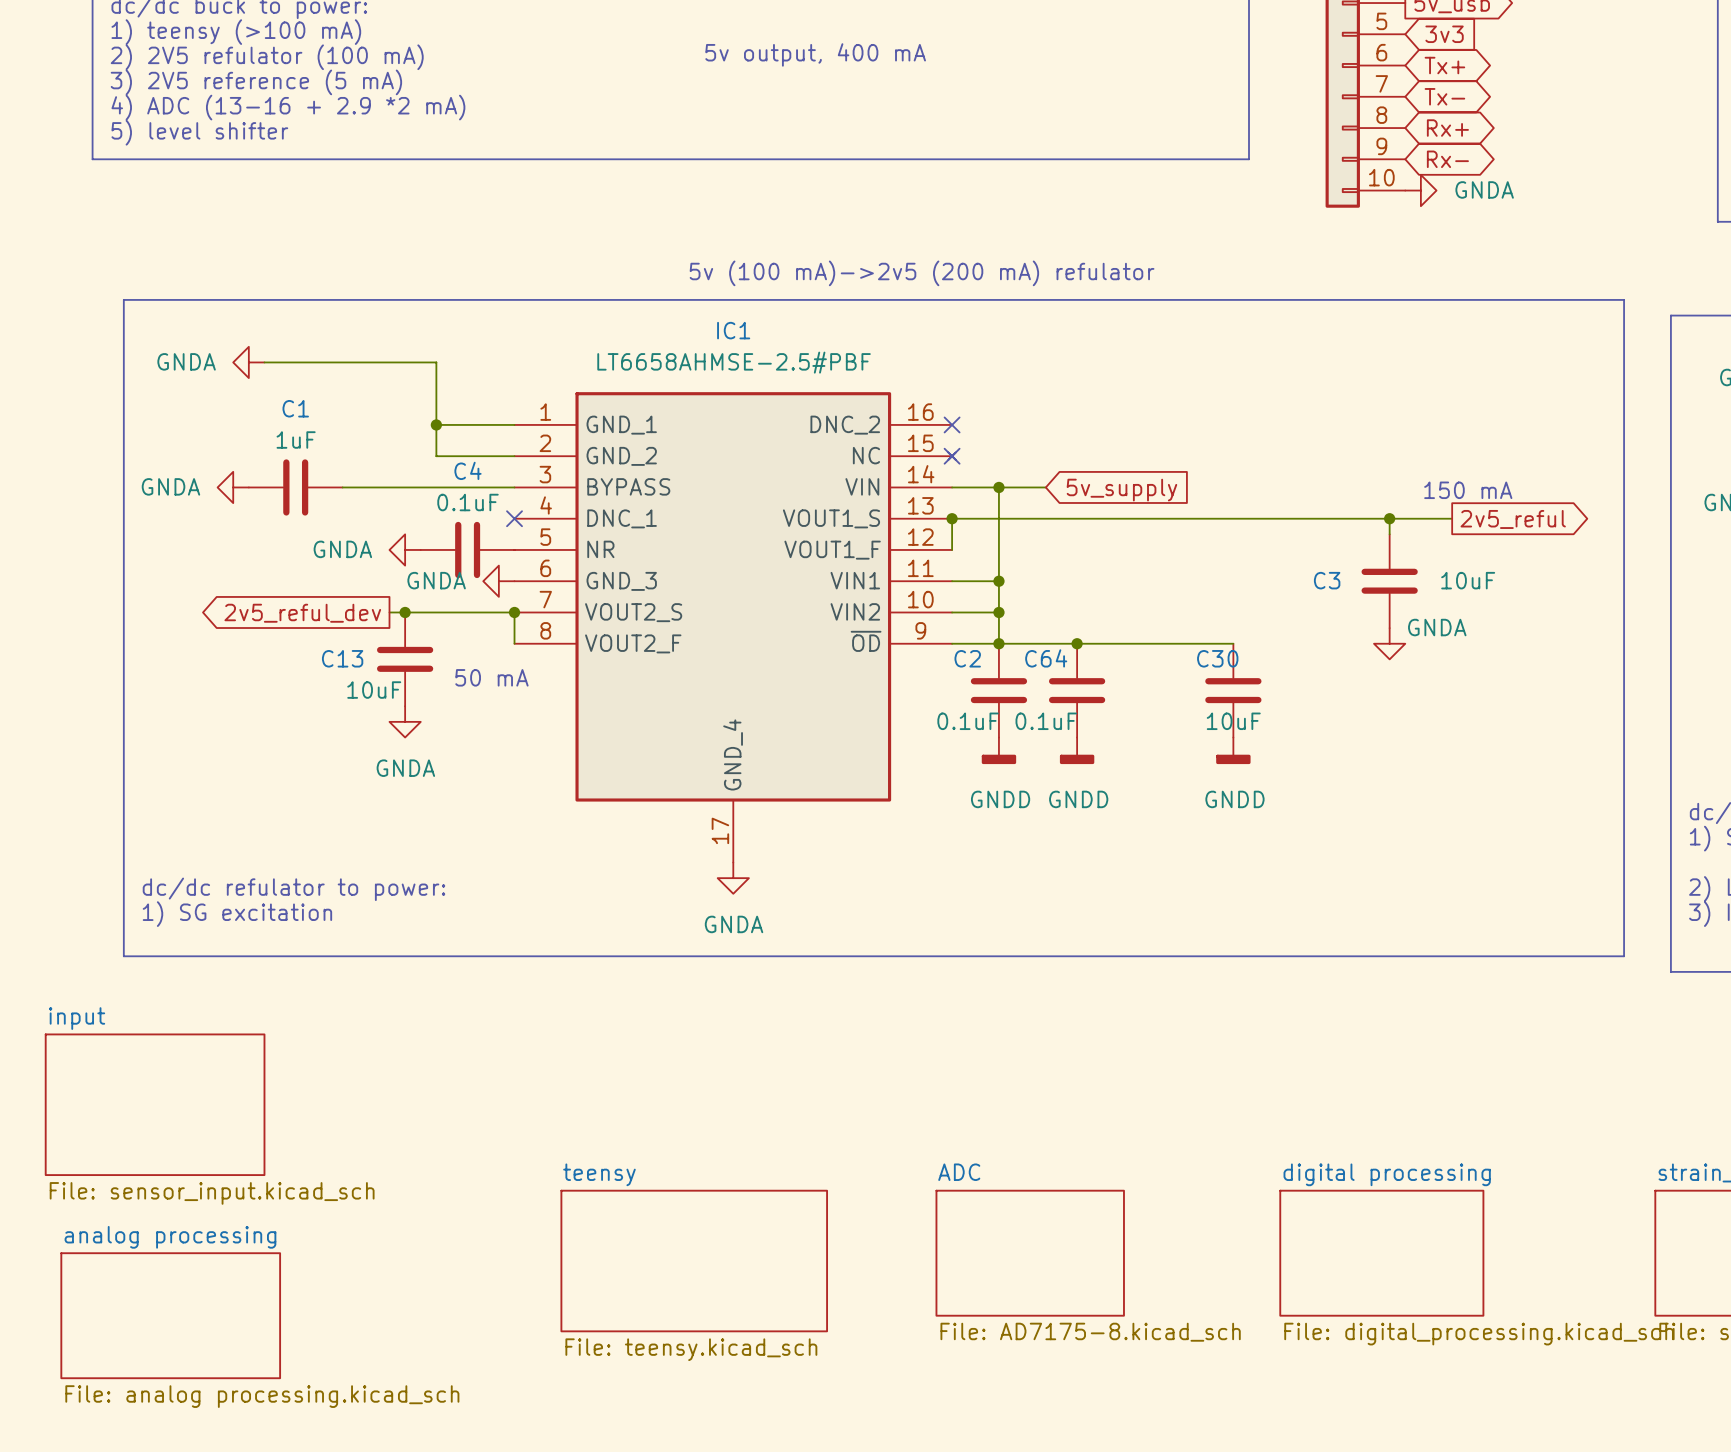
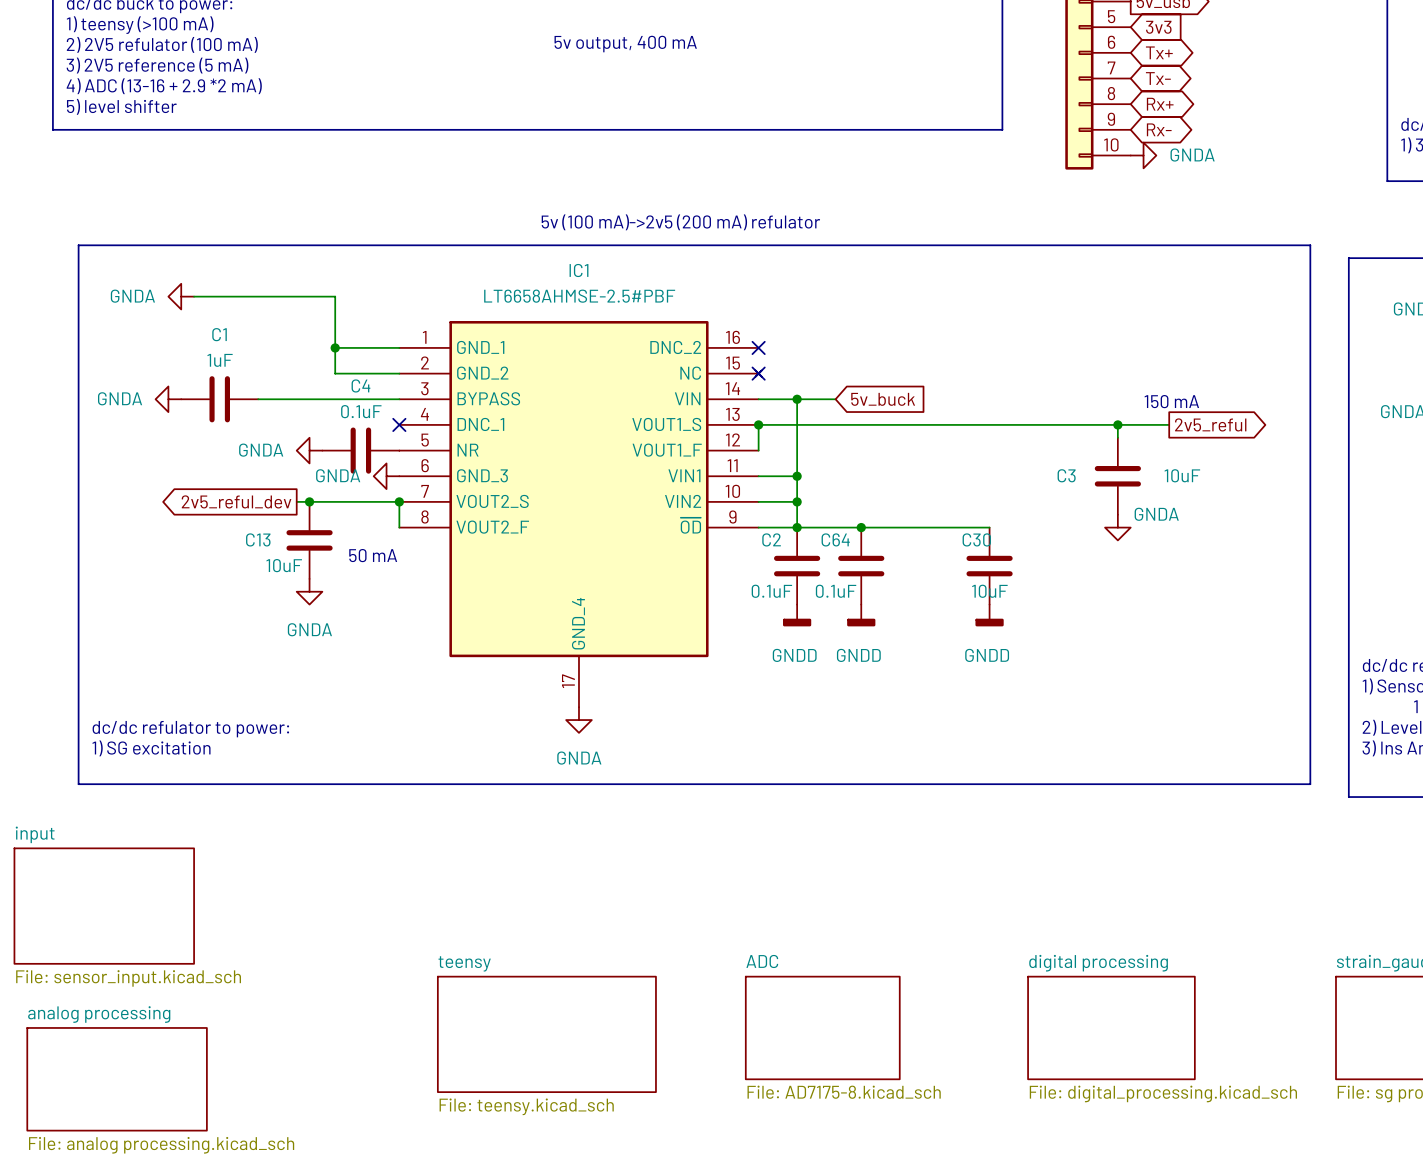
global label: 5v_supply (1121, 490) -> 5v_buck (883, 399)

